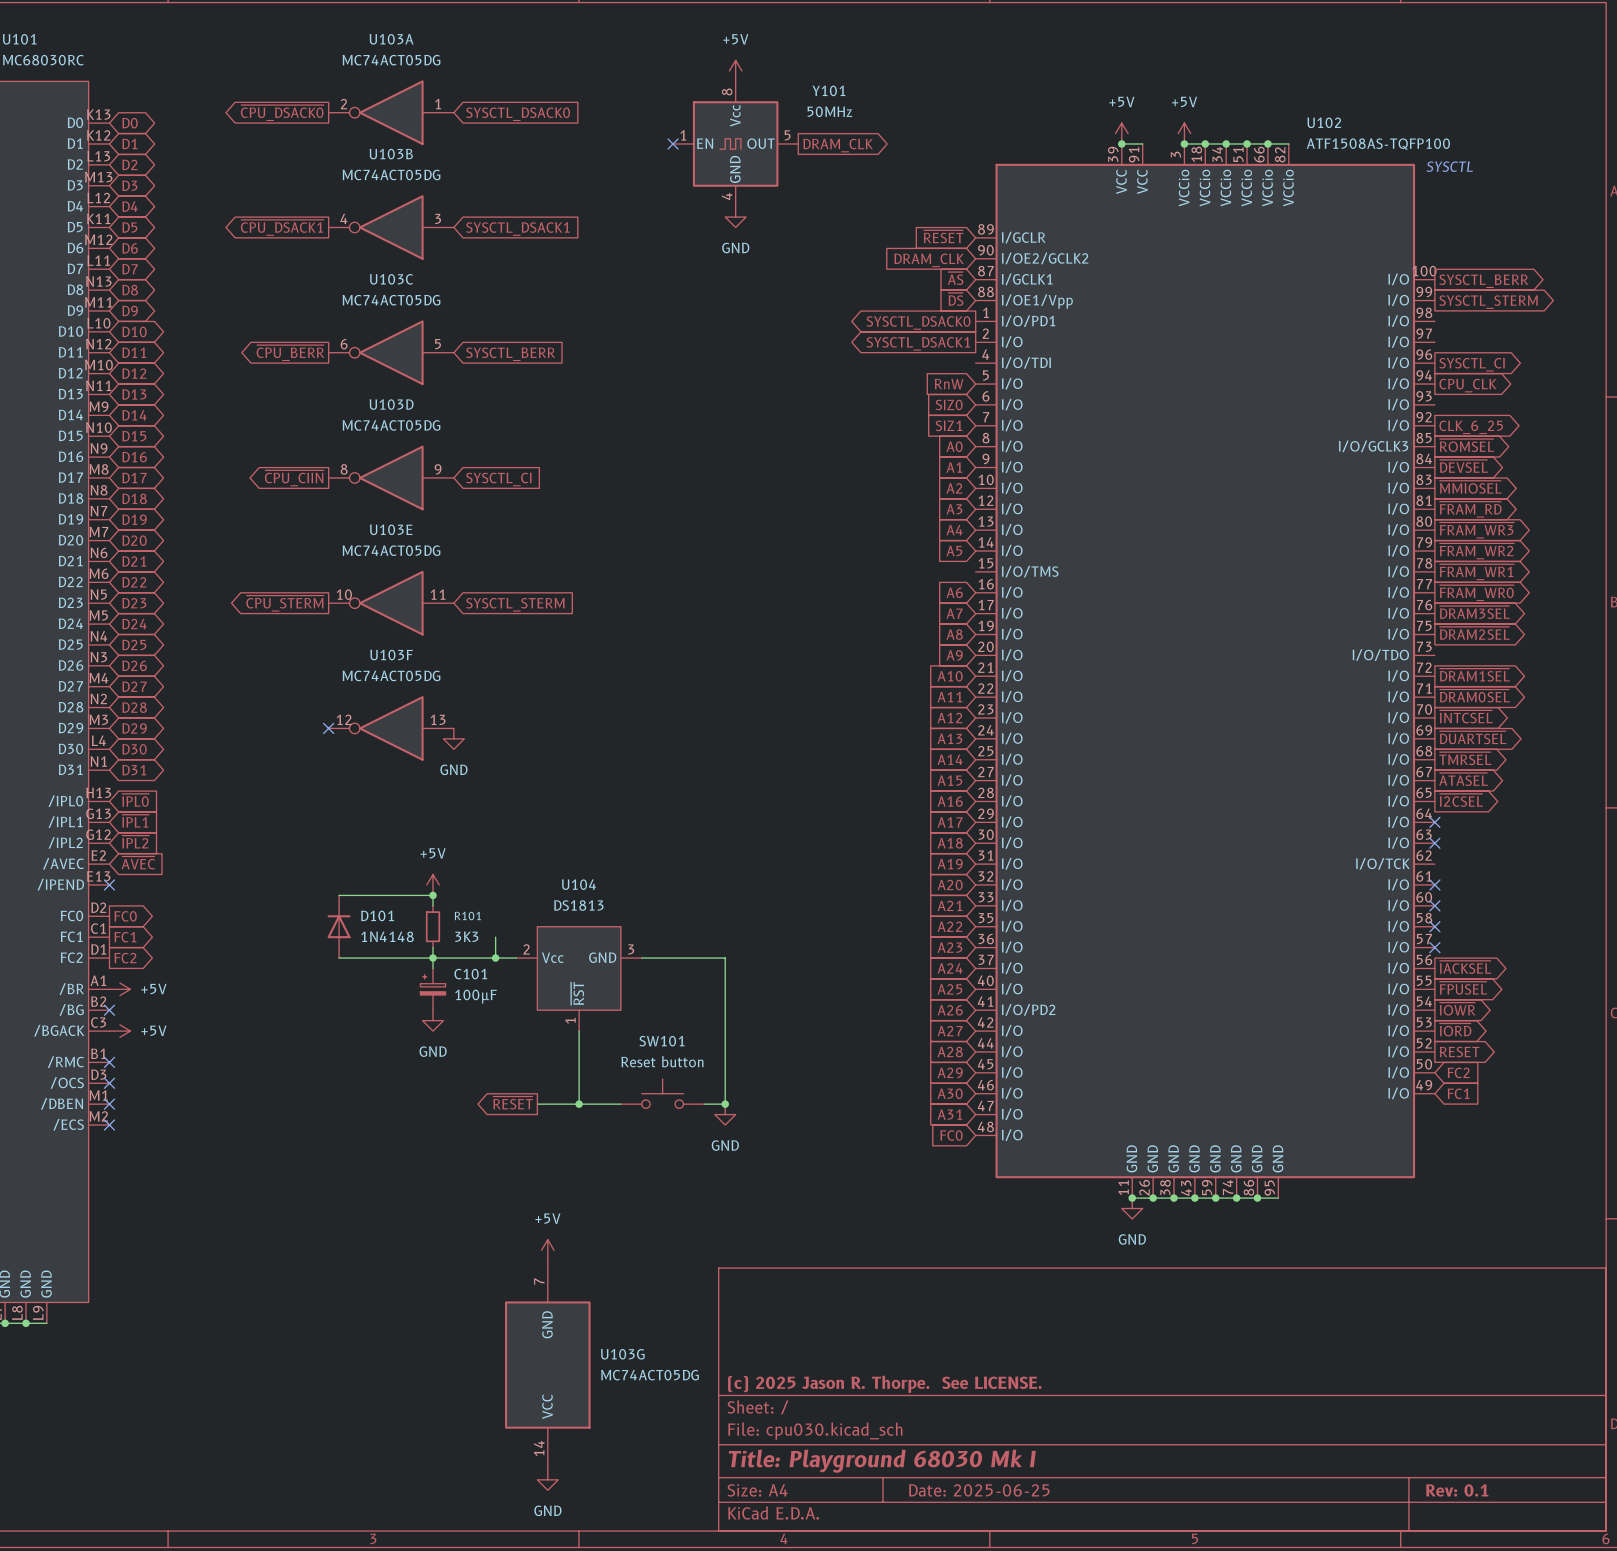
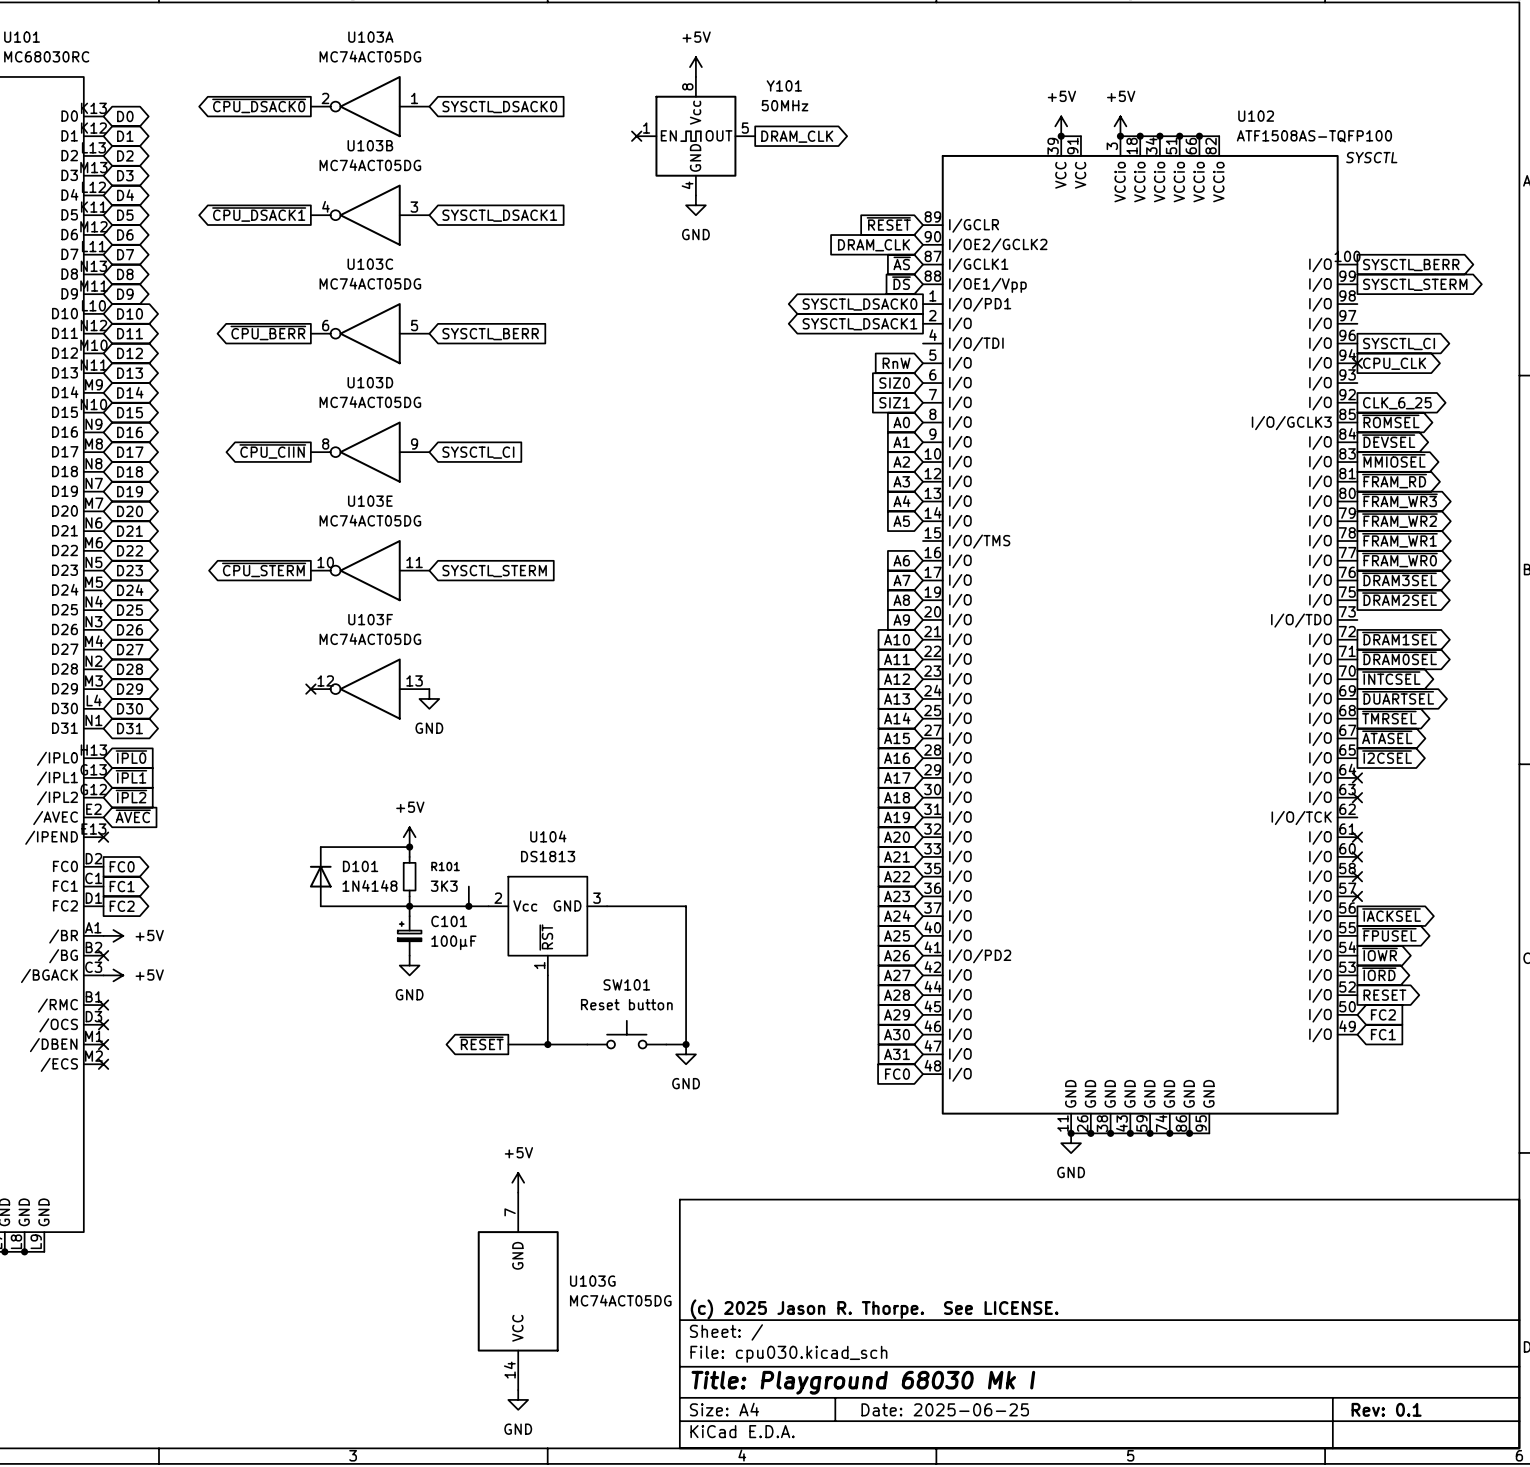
no-connect mark: none -> (1357, 363)

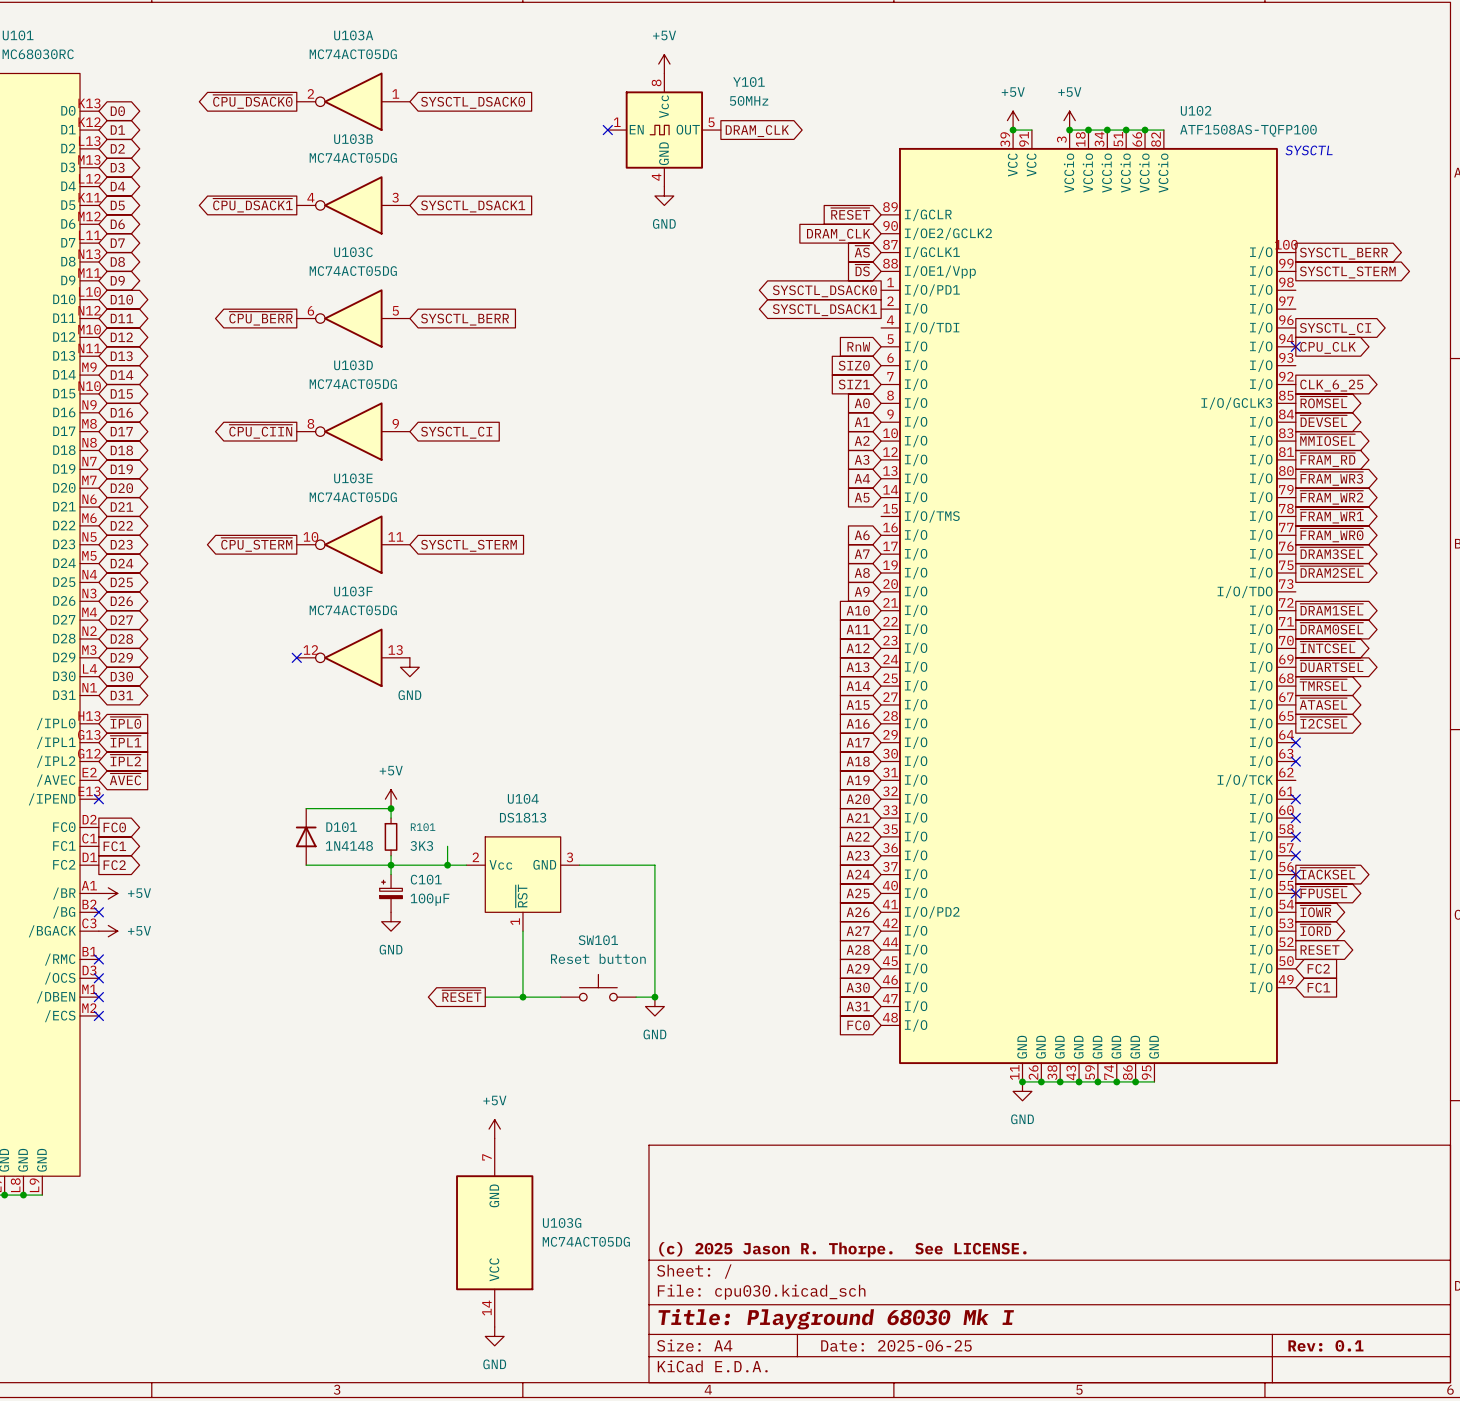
no-connect mark: none -> (1295, 874)
no-connect mark: none -> (1295, 893)

